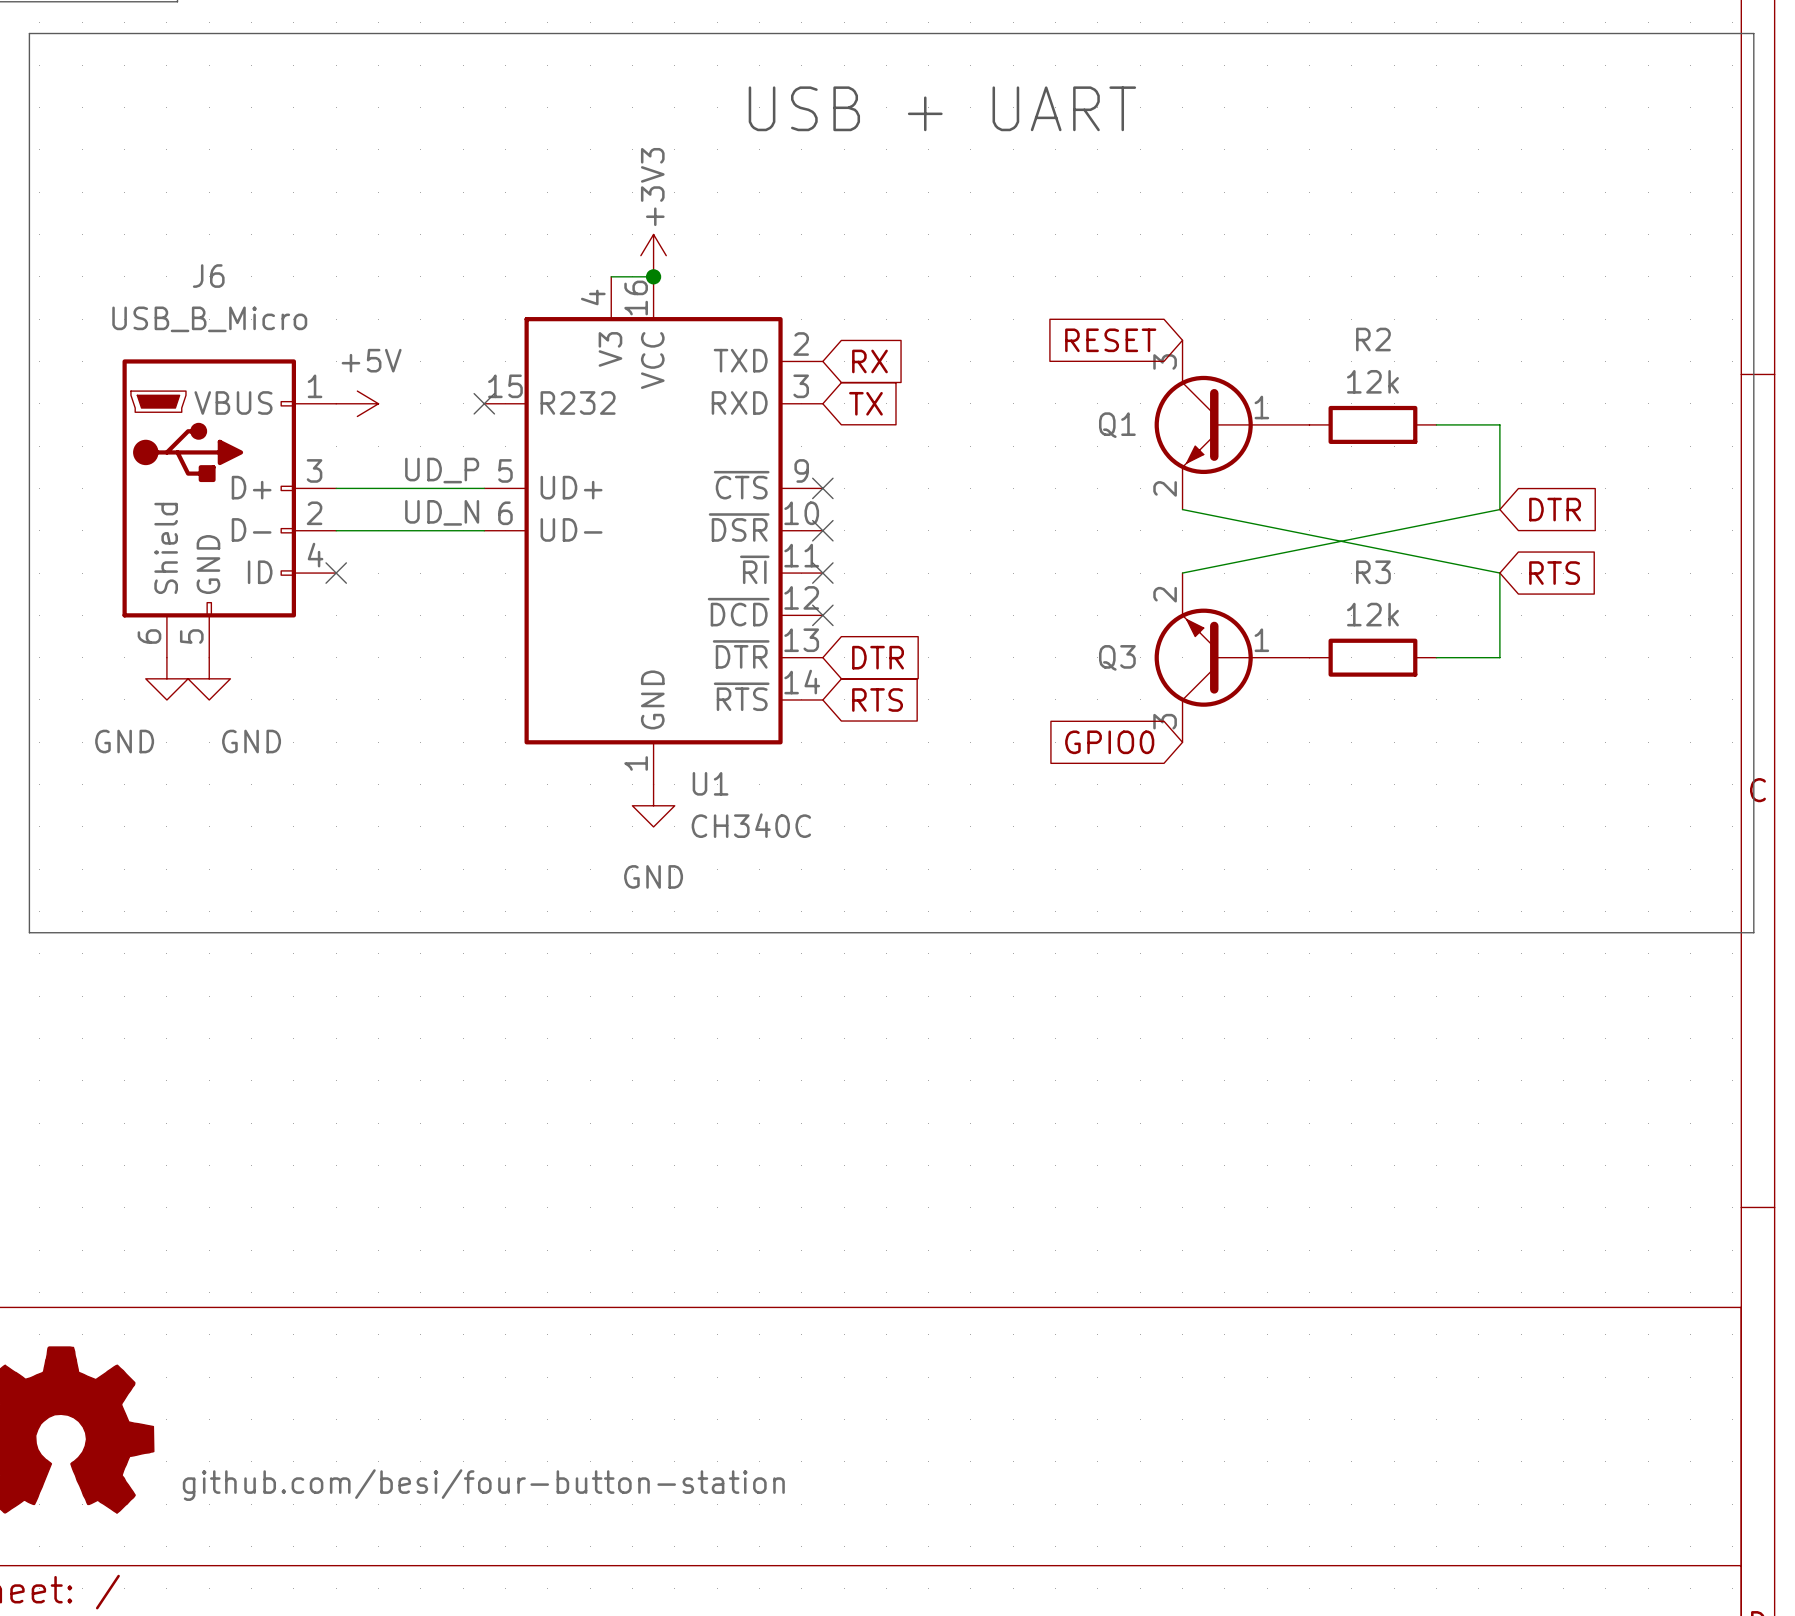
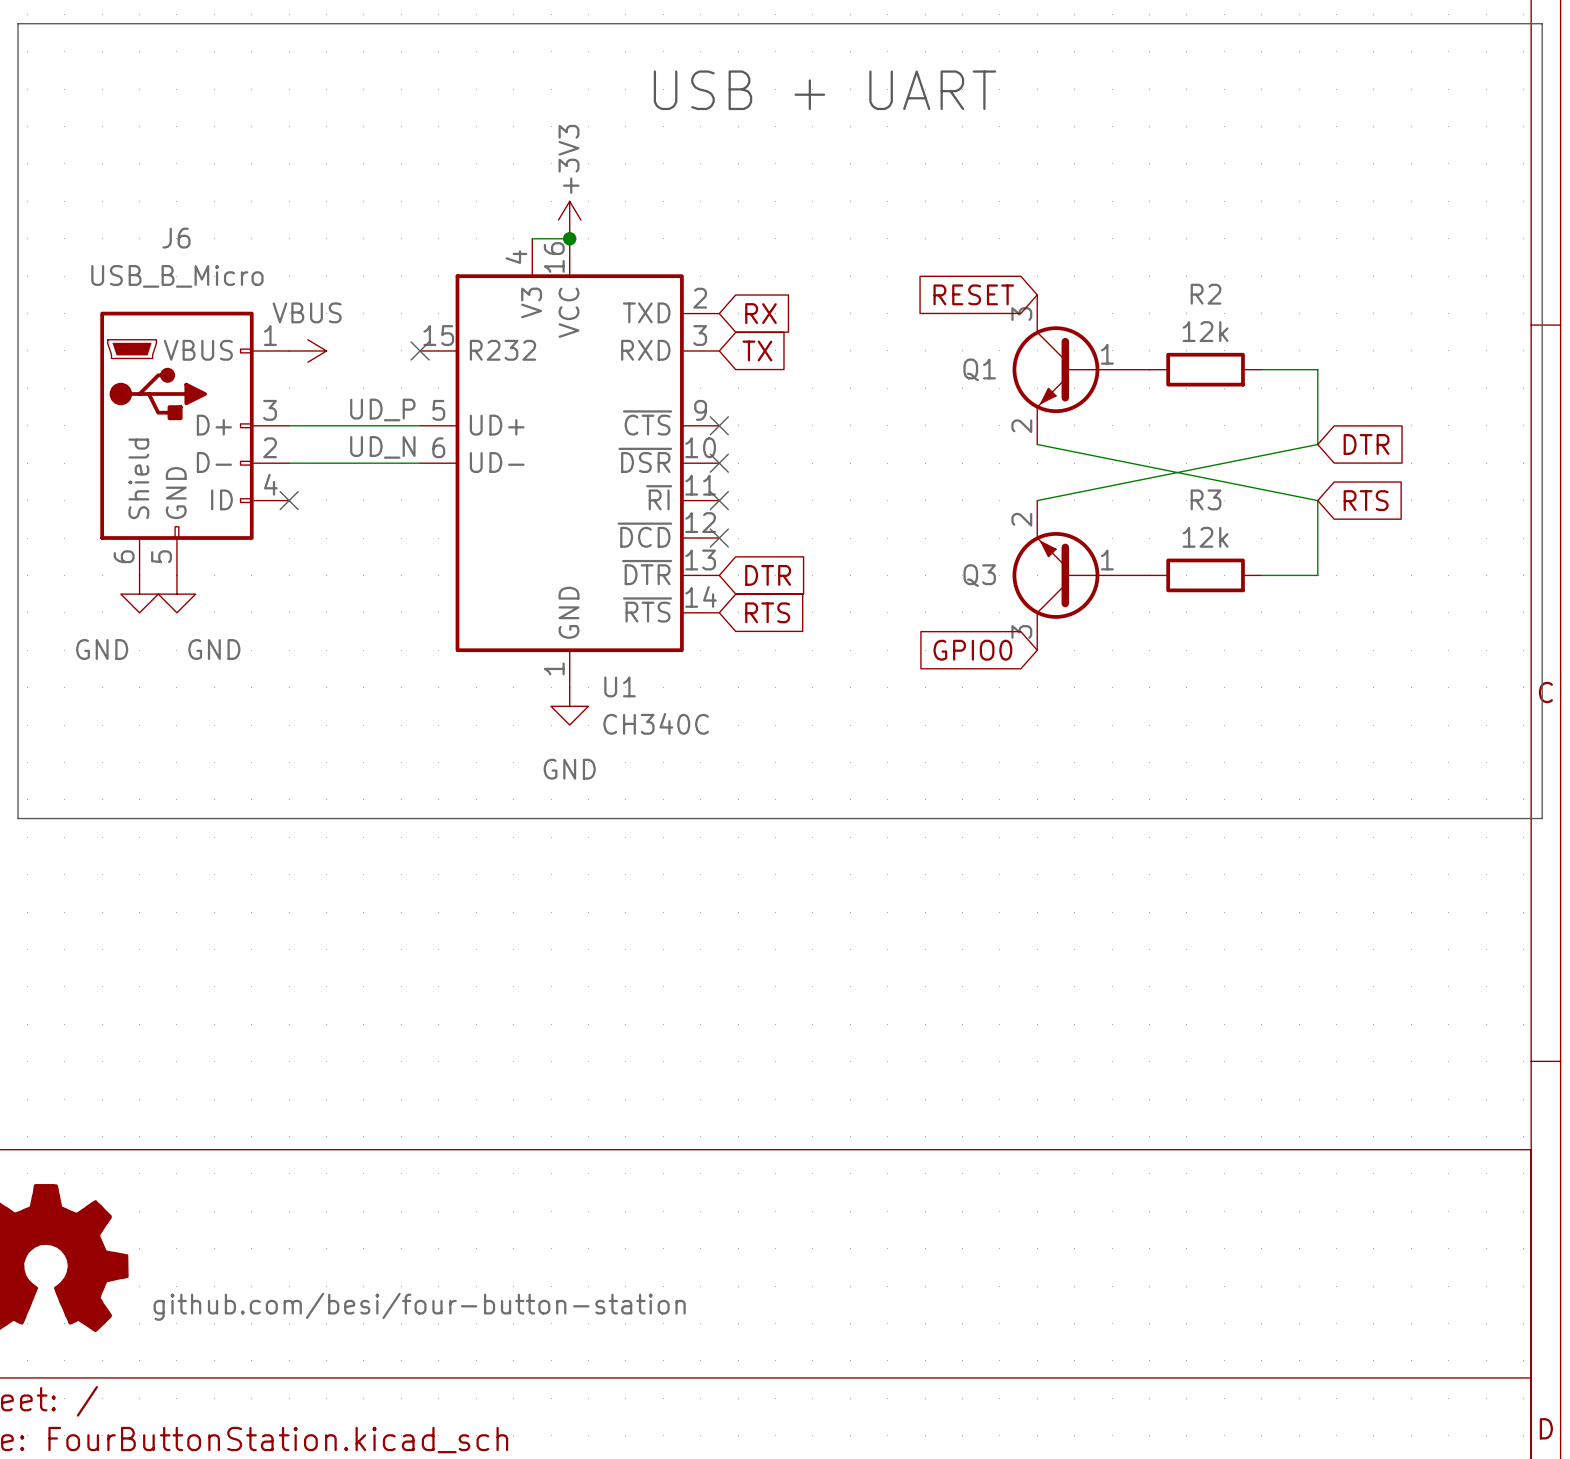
power symbol: +5V (357, 403) -> VBUS (307, 350)

